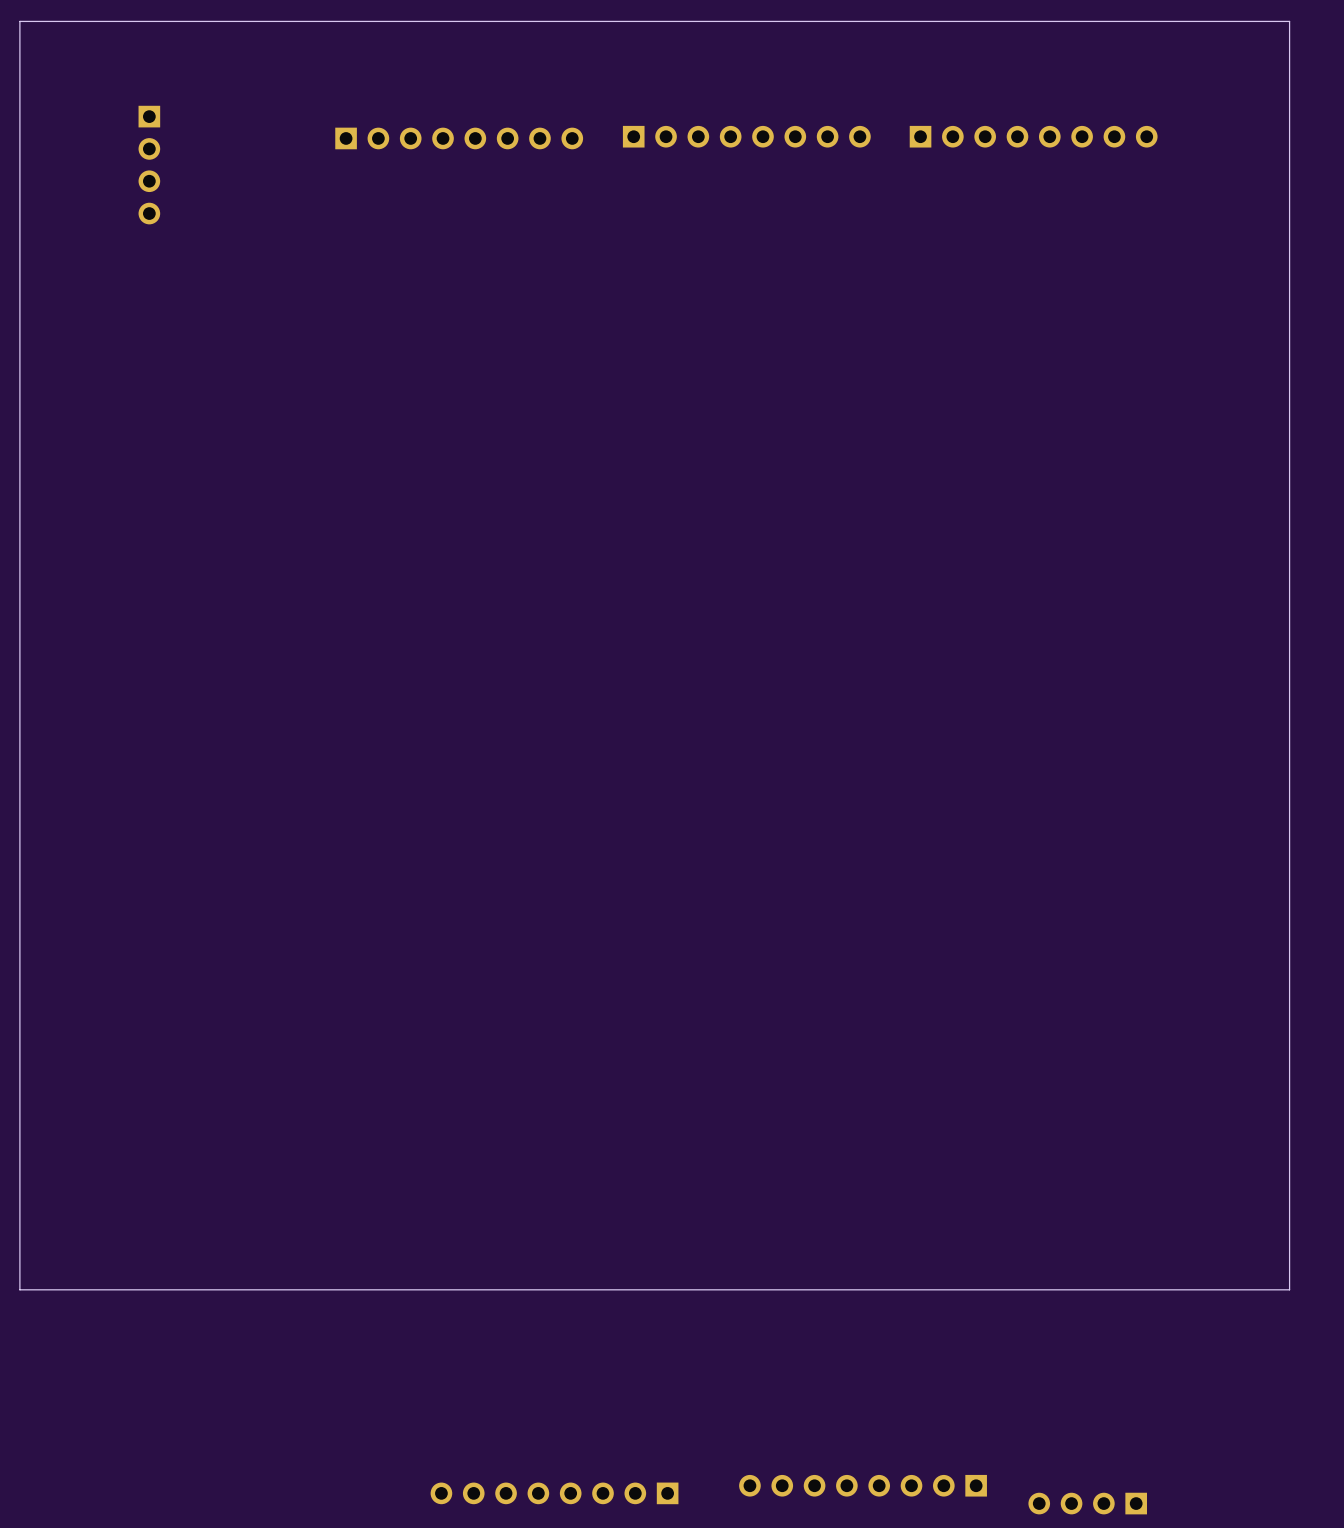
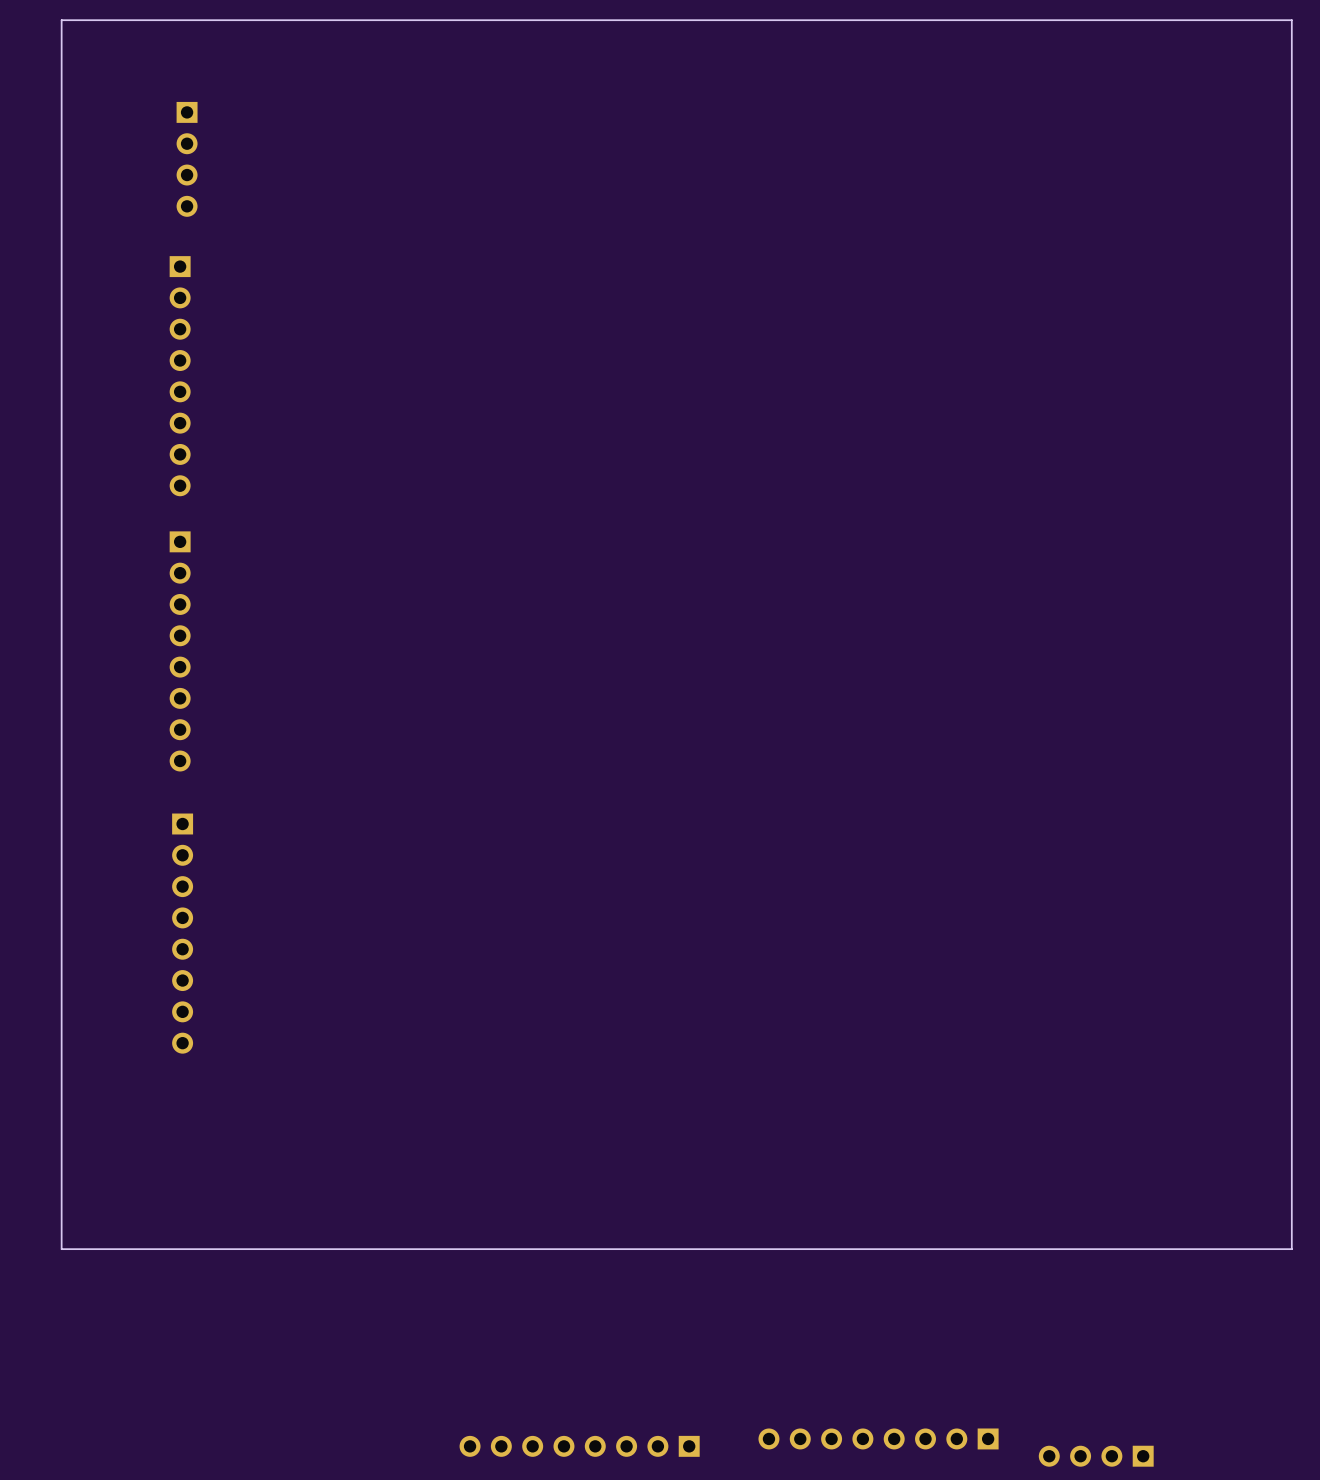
part: (746, 136) -> none
part: (1033, 136) -> none
part: (459, 138) -> none
part: none -> (180, 376)
part: none -> (180, 651)
part: none -> (182, 933)

